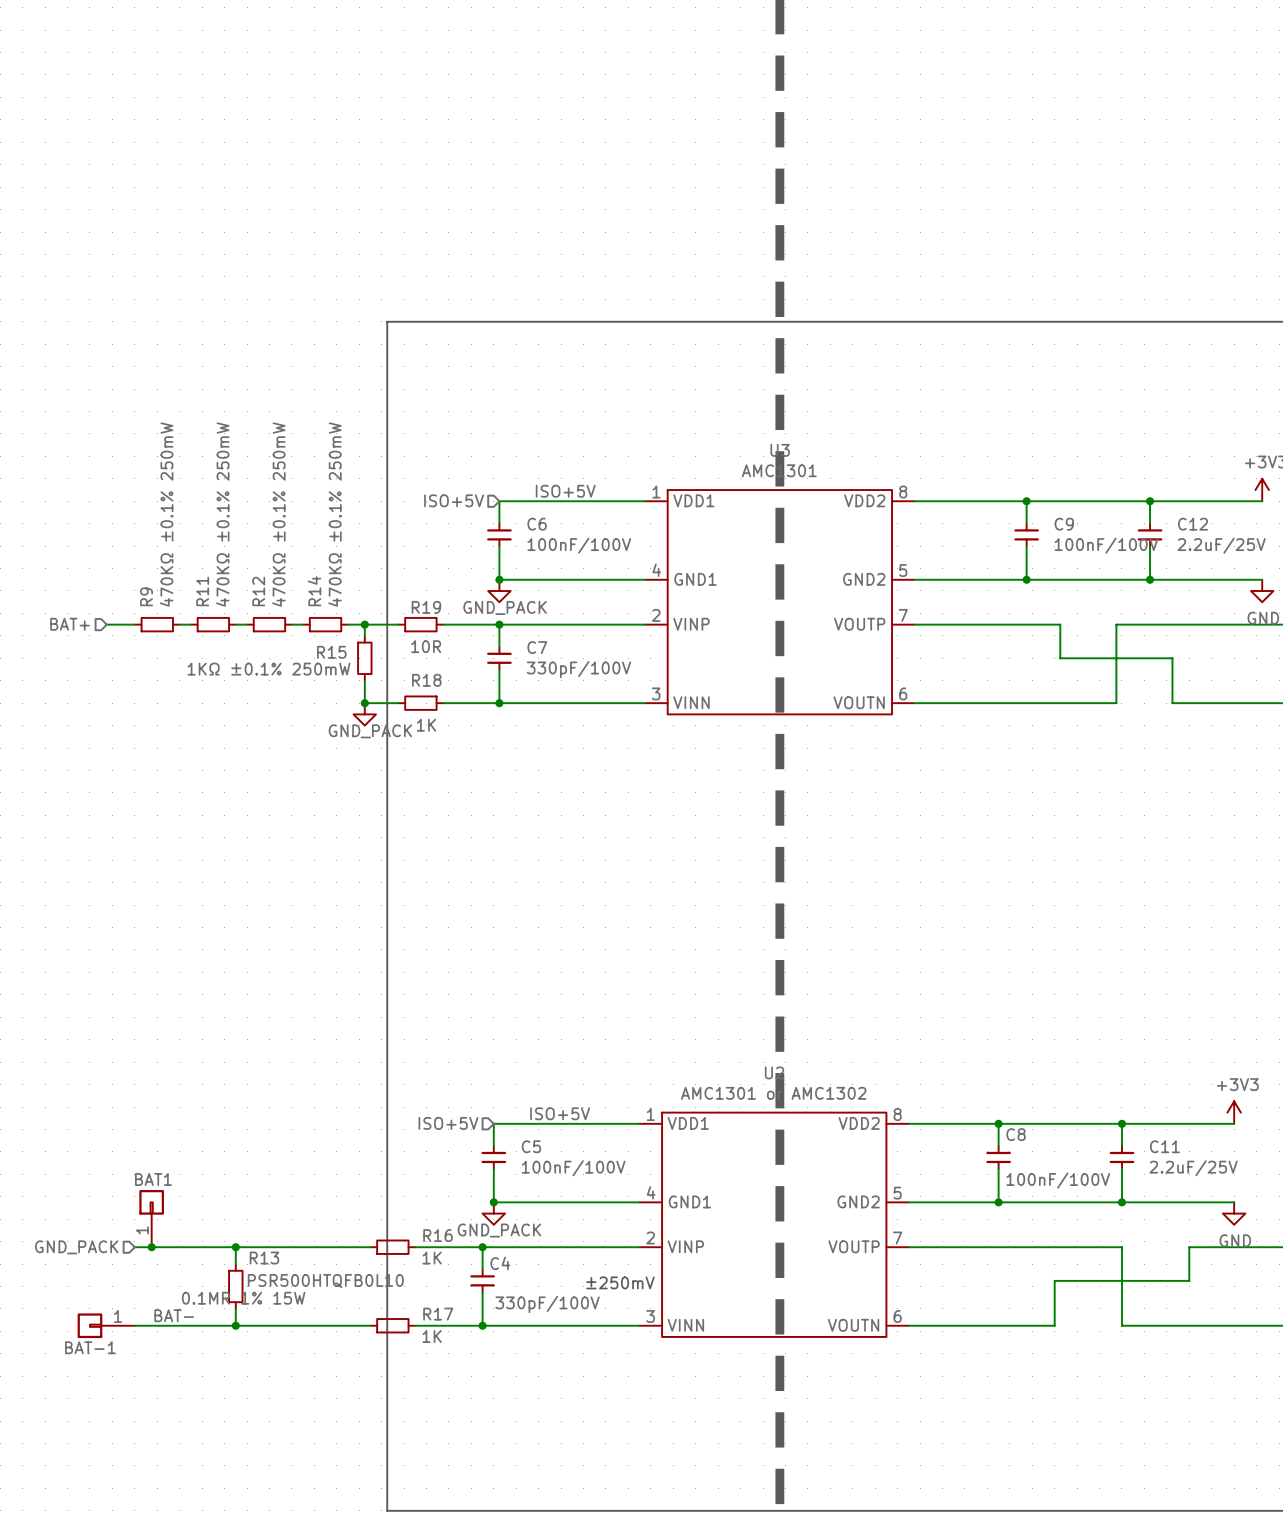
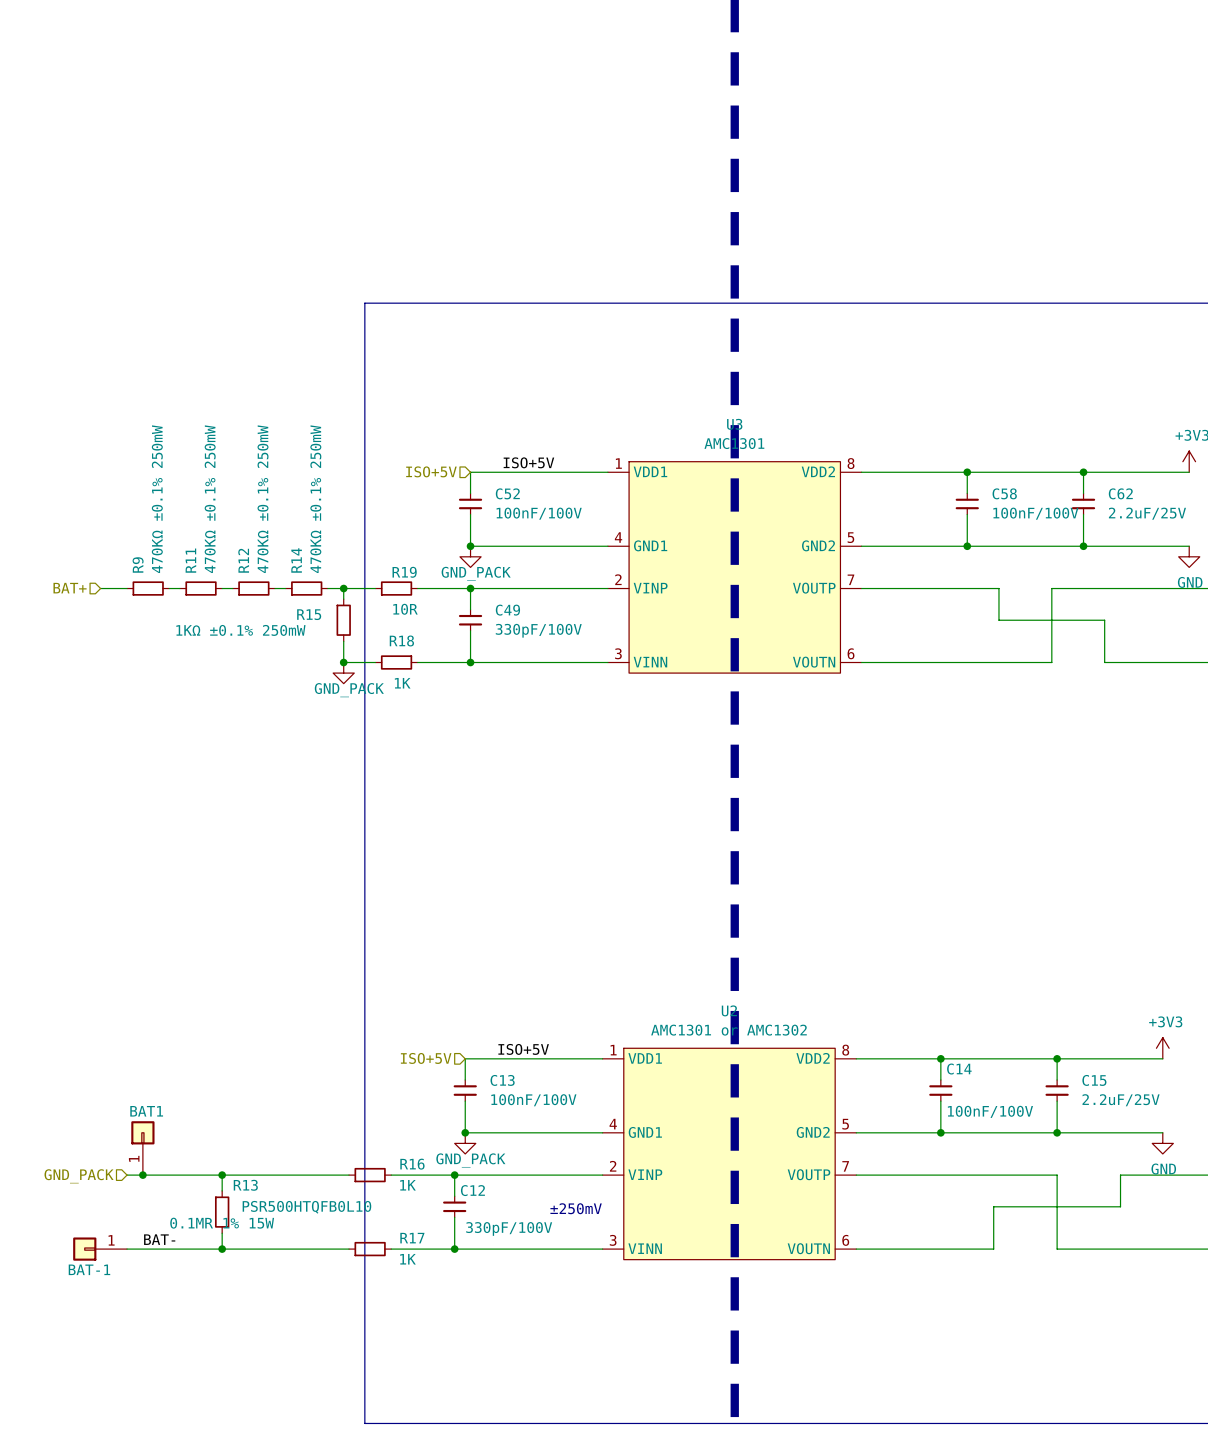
C6 name: C6 (537, 524) -> C52 (507, 493)
C9 name: C9 (1064, 524) -> C58 (1004, 493)
C12 name: C12 (1193, 524) -> C62 (1120, 493)
C7 name: C7 (537, 647) -> C49 (507, 610)
C8 name: C8 (1016, 1134) -> C14 (959, 1069)
C5 name: C5 (531, 1146) -> C13 (502, 1080)
C11 name: C11 (1164, 1146) -> C15 (1094, 1080)
C4 name: C4 (500, 1263) -> C12 (472, 1190)

